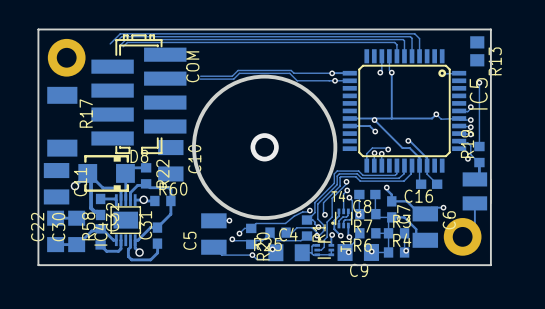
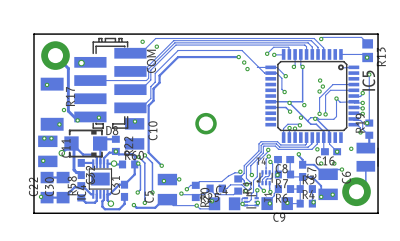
track: none -> (321, 39) (322, 37) (361, 37) (367, 43)
via: none -> (321, 39)
via: none -> (142, 41)
track: (117, 41) (121, 36) (410, 36) (412, 46) -> (129, 71) (143, 71) (173, 40) (311, 40) (318, 47)
track: (110, 43) (120, 33) (414, 33) (419, 38) (419, 47) -> (129, 53) (140, 53) (155, 38) (314, 38) (323, 48)
track: (120, 45) (126, 39) (403, 39) (404, 46) -> (89, 80) (146, 80) (148, 78) (148, 69) (174, 42) (308, 42) (312, 47)
via: none -> (156, 46)
track: (396, 46) (394, 42) (127, 42) (123, 46) -> (306, 46) (304, 45) (175, 45) (150, 70) (150, 80) (141, 89) (129, 89)
track: none -> (267, 53) (273, 47) (288, 47) (289, 54)
via: none -> (267, 53)
via: none -> (274, 54)
track: none -> (283, 54) (274, 54)
track: none -> (340, 54) (367, 54) (367, 57) (372, 61) (367, 57)
track: none -> (55, 55) (68, 68) (68, 111) (77, 120) (81, 116) (89, 116)
track: none -> (238, 57) (178, 57) (159, 75) (159, 82) (153, 88) (153, 100) (148, 105) (148, 152) (161, 165)
via: none -> (238, 57)
via: none -> (367, 57)
via: none -> (244, 62)
via: none -> (81, 63)
via: (332, 73) -> none
track: (349, 73) (238, 70) (232, 76) (200, 76) -> (270, 67) (276, 67) (285, 76)
round board edge: [192, 74, 338, 220] -> none
via: none -> (247, 69)
track: (199, 79) (233, 79) (239, 73) (289, 73) (297, 80) (341, 80) -> (129, 107) (141, 107) (150, 98) (150, 86) (155, 82) (155, 73) (178, 50) (242, 50) (264, 73)
via: (335, 80) -> none
track: none -> (270, 73) (276, 73) (281, 78) (281, 89) (284, 92)
via: none -> (285, 76)
via: none -> (320, 80)
track: none -> (353, 84) (333, 84) (319, 98) (319, 113)
via: none -> (47, 84)
via: none -> (322, 86)
track: none -> (353, 90) (330, 90) (325, 95) (325, 114)
via: none -> (319, 91)
via: none -> (284, 92)
track: (436, 114) (432, 118) (391, 118) -> (336, 98) (336, 116) (333, 119) (310, 117) (308, 121)
via: none -> (304, 105)
via: none -> (63, 110)
via: none -> (319, 113)
via: none -> (325, 114)
via: none -> (98, 117)
via: none -> (301, 117)
via: none -> (77, 120)
via: none -> (134, 121)
via: none -> (367, 123)
via: none -> (59, 124)
via: none -> (44, 138)
via: none -> (51, 138)
via: none -> (351, 148)
via: none -> (317, 149)
via: none -> (115, 151)
via: none -> (337, 151)
track: none -> (144, 155) (152, 163) (152, 192)
via: none -> (144, 155)
track: none -> (138, 157) (144, 163) (144, 202)
via: none -> (138, 157)
via: none -> (43, 160)
track: none -> (138, 163) (140, 165) (140, 189) (137, 192)
via: none -> (138, 163)
via: none -> (321, 163)
via: none -> (334, 163)
via: none -> (161, 165)
via: none -> (163, 181)
via: none -> (137, 192)
via: none -> (152, 192)
via: none -> (332, 194)
via: none -> (41, 196)
via: none -> (321, 196)
track: none -> (167, 199) (163, 199) (155, 207) (136, 207) (133, 205)
via: none -> (144, 202)
via: none -> (257, 202)
via: none -> (242, 203)
via: none -> (133, 205)

